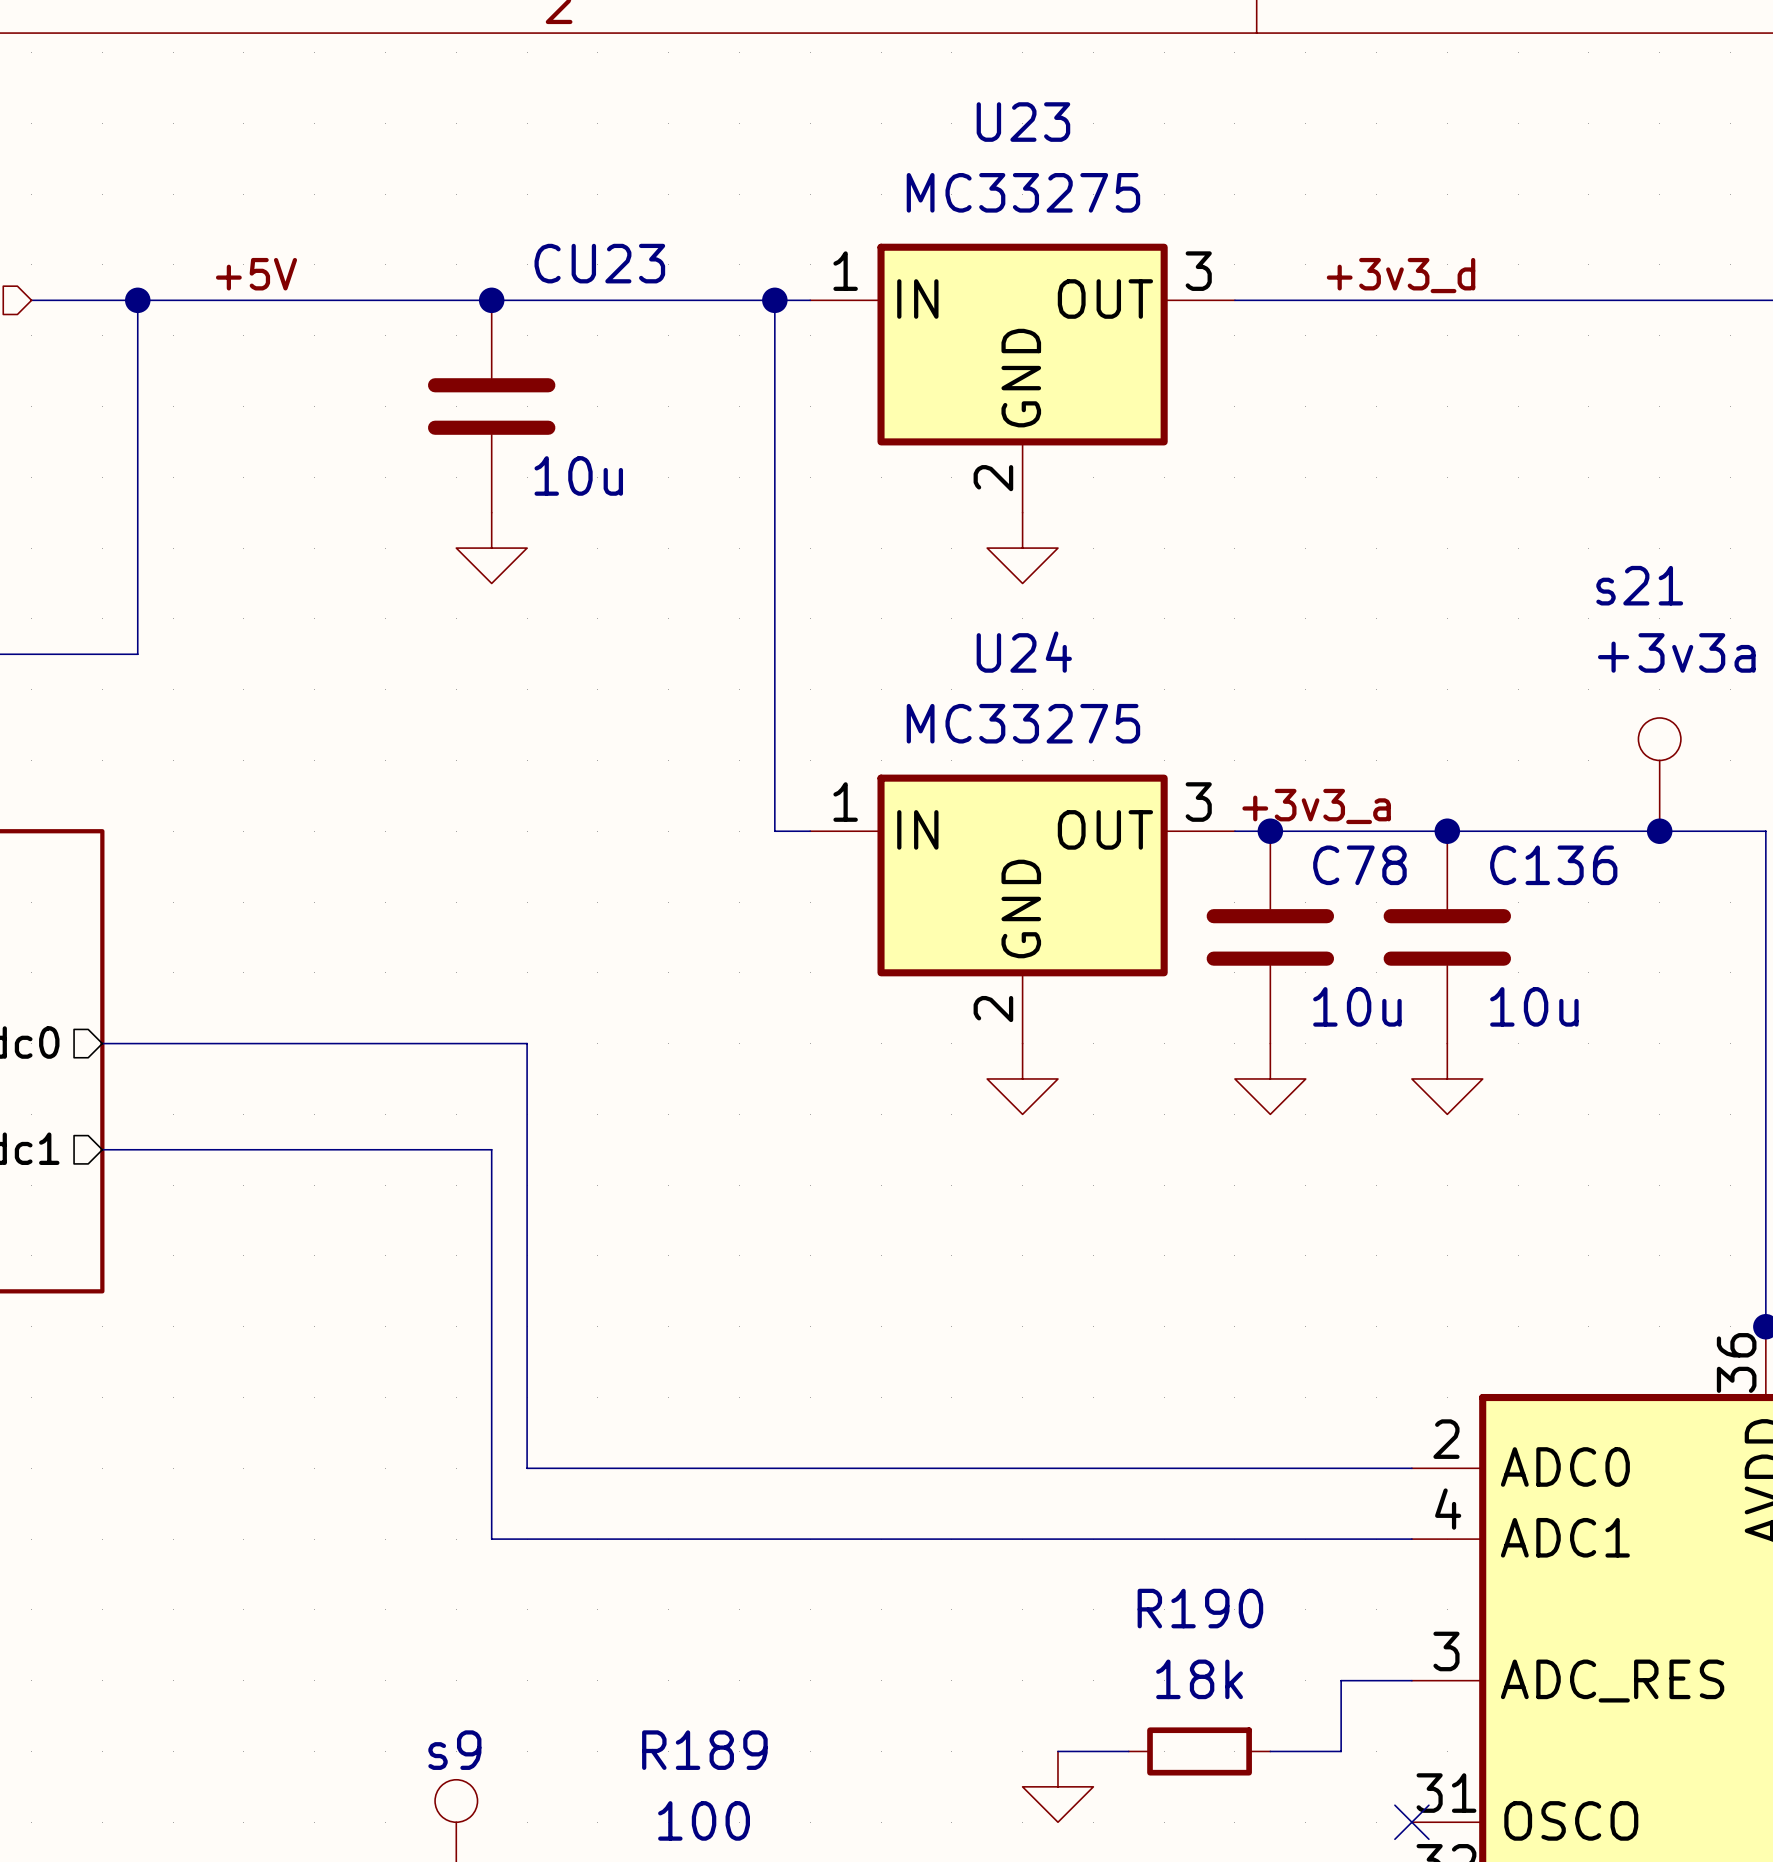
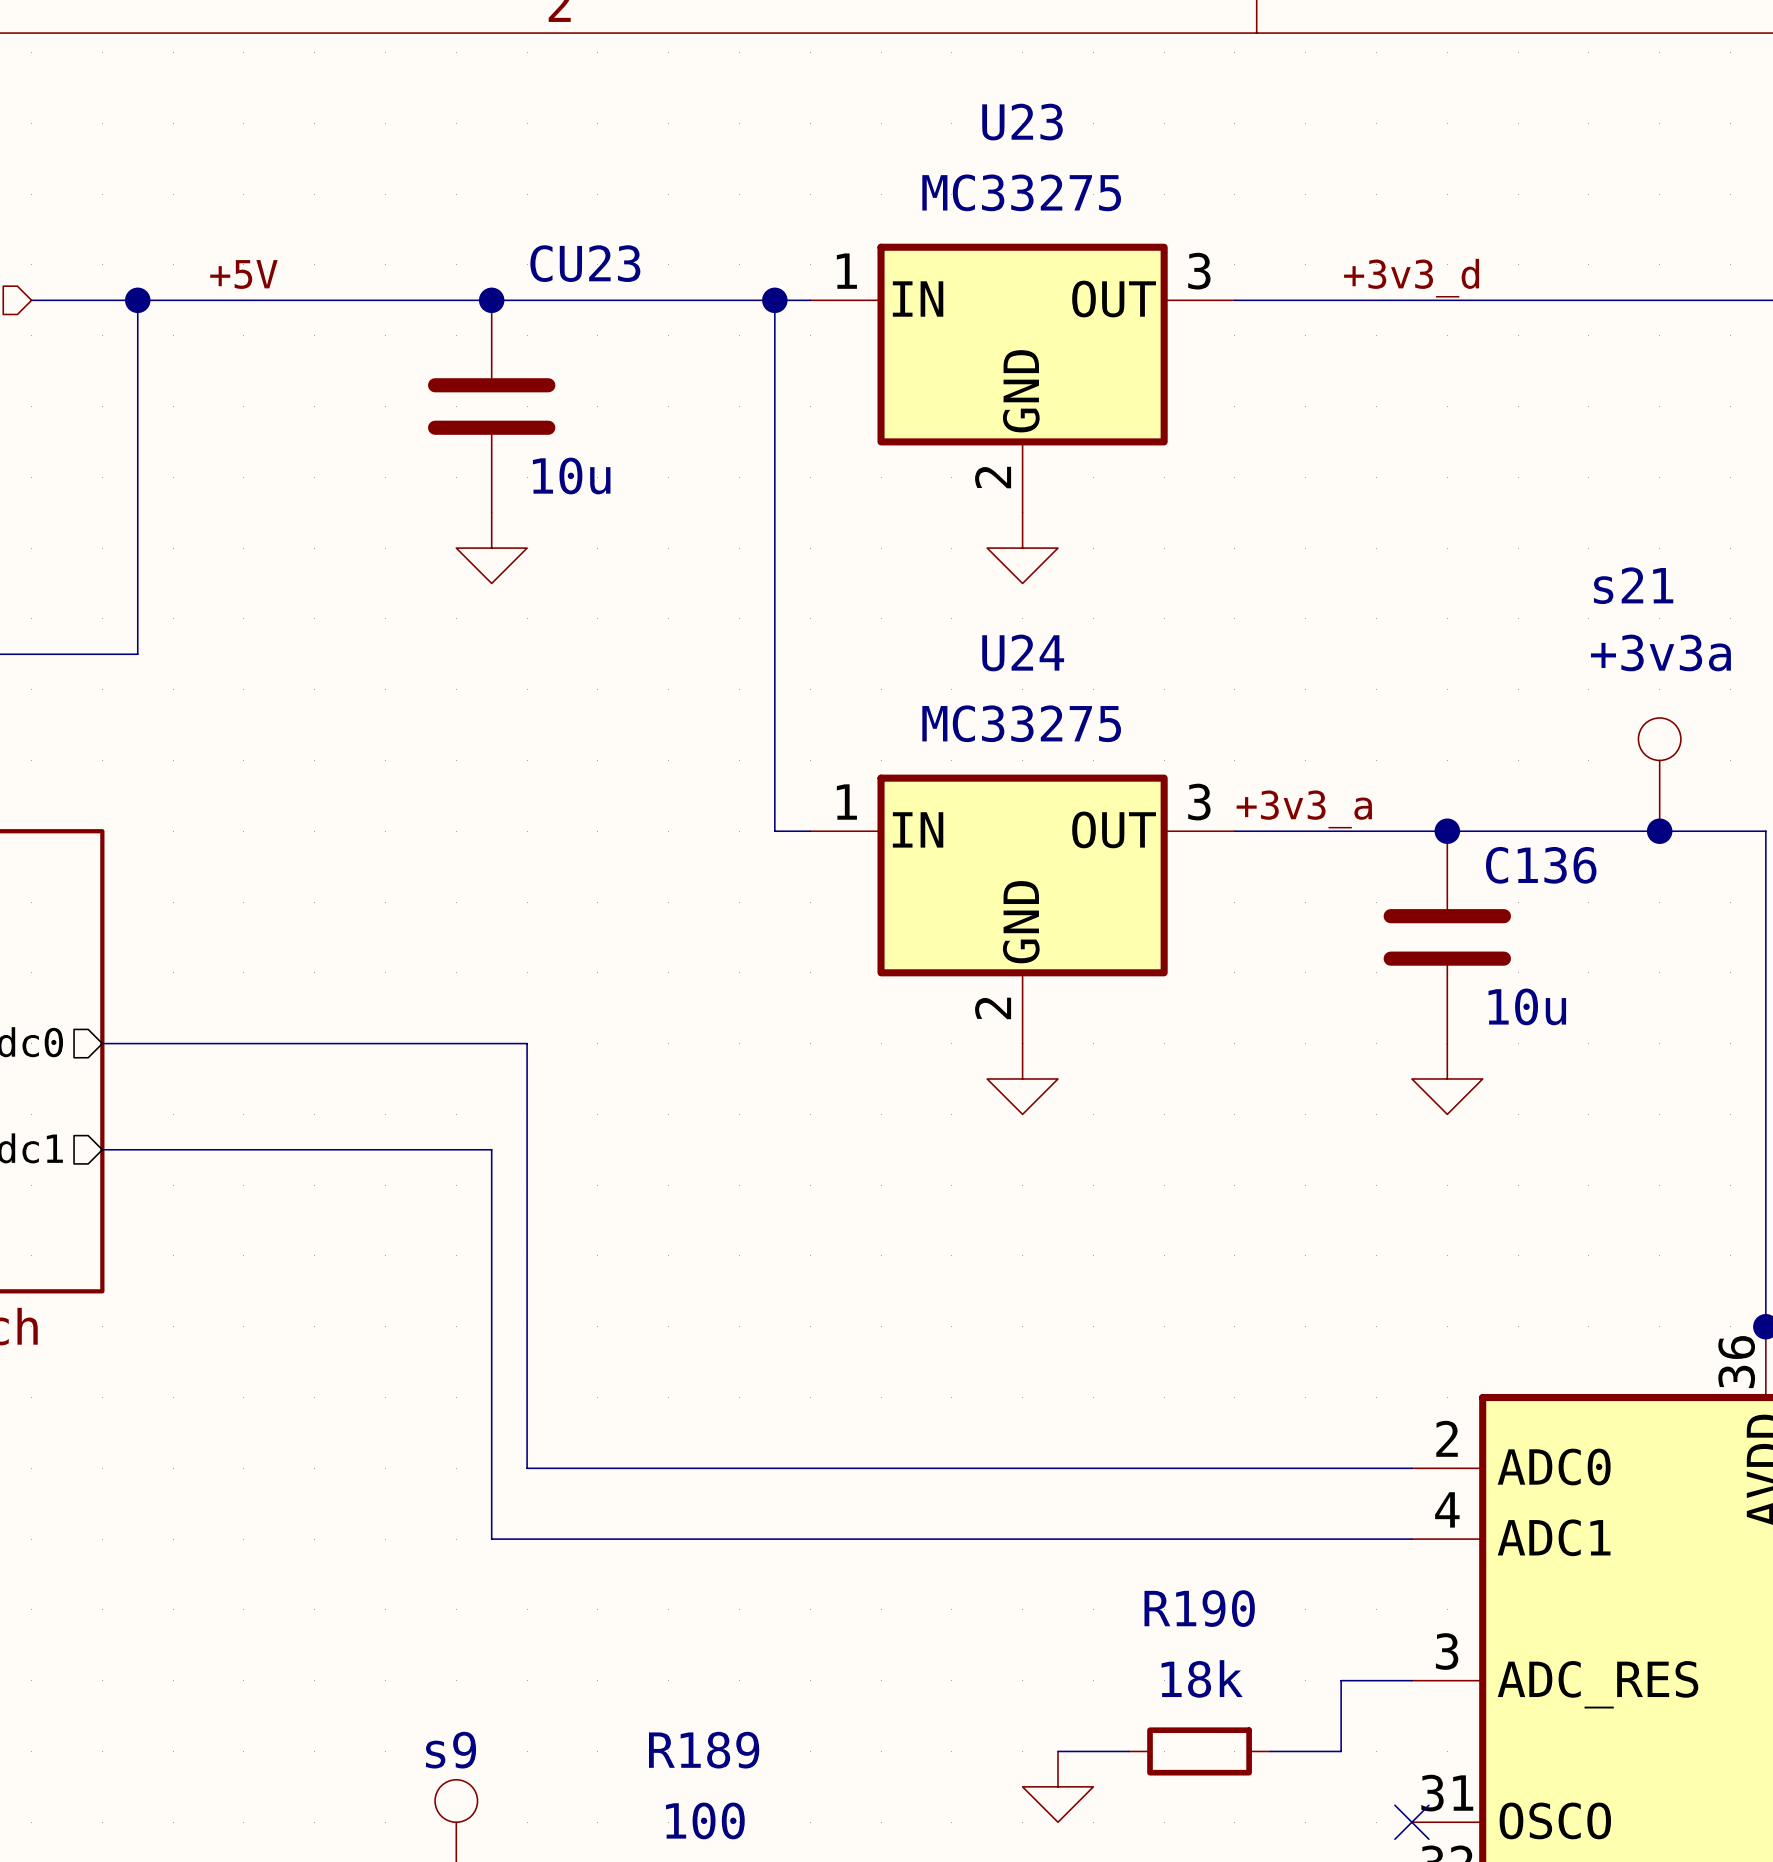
junction: (1270, 831) -> none
C78: 10u (1270, 937) -> none
power symbol: (1270, 1078) -> none

